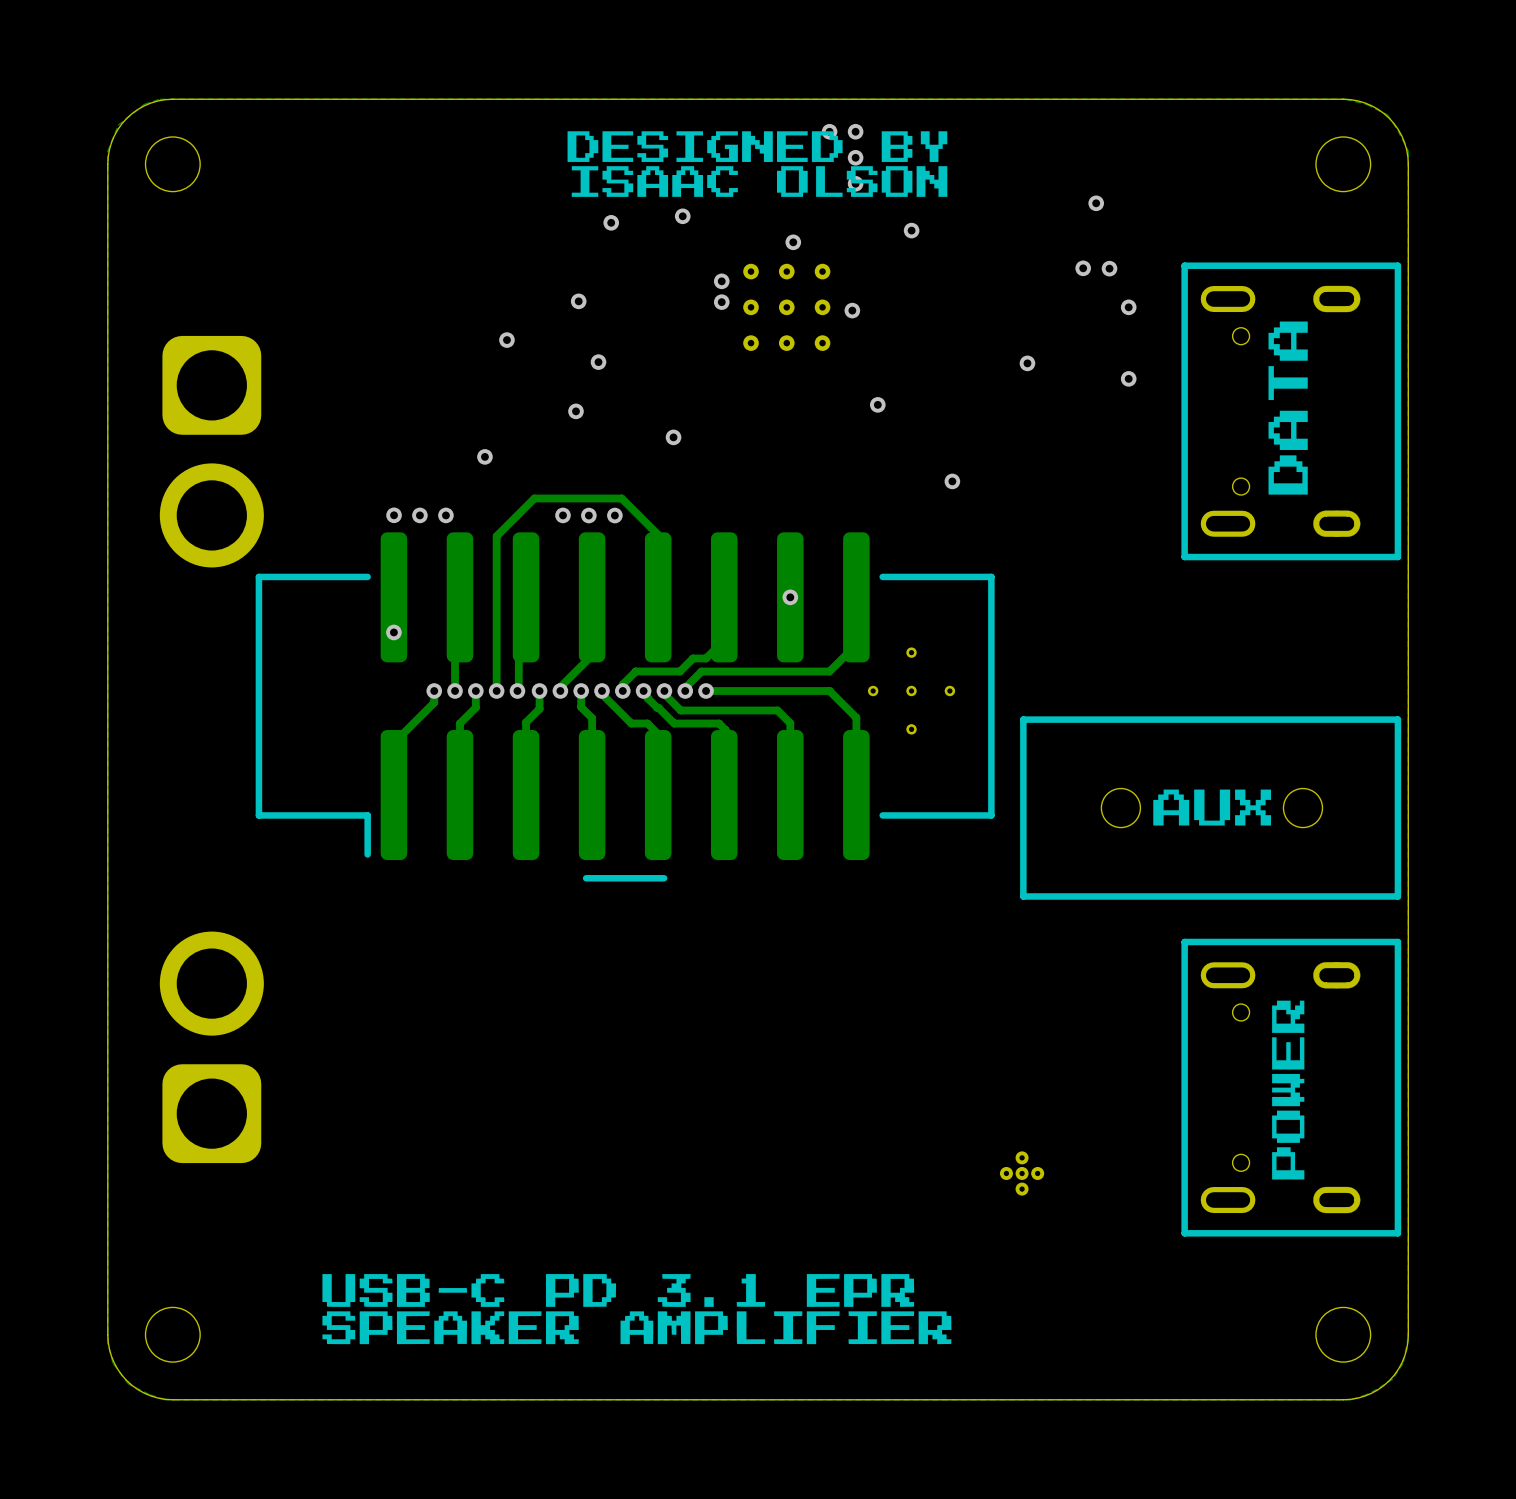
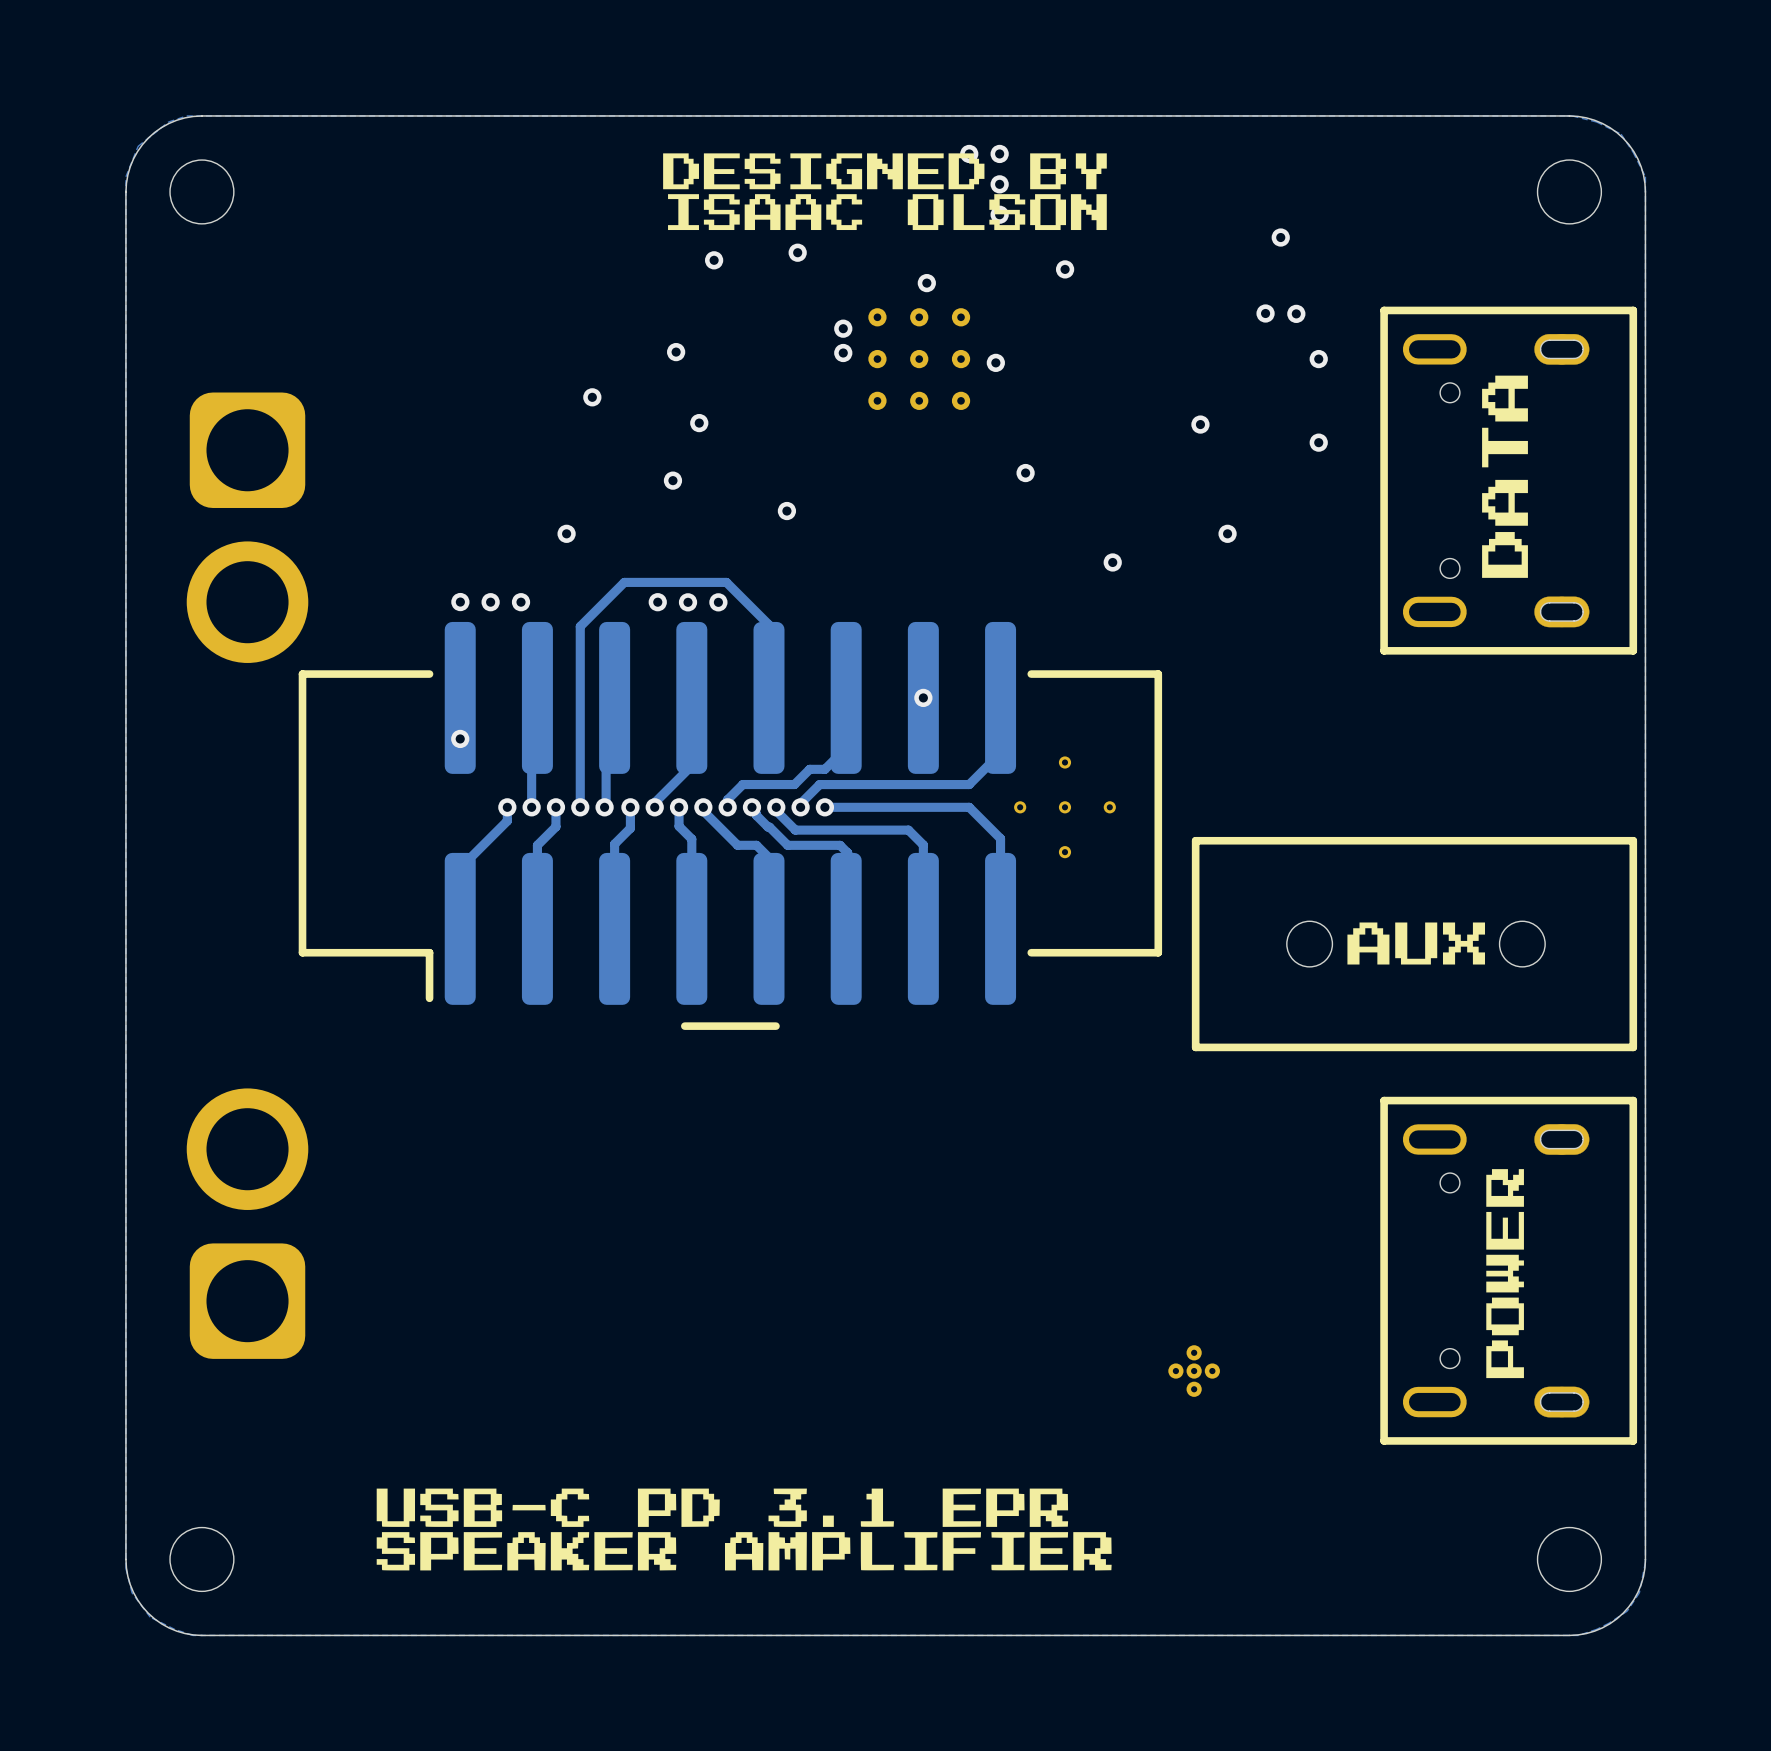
via: none -> (1227, 533)

